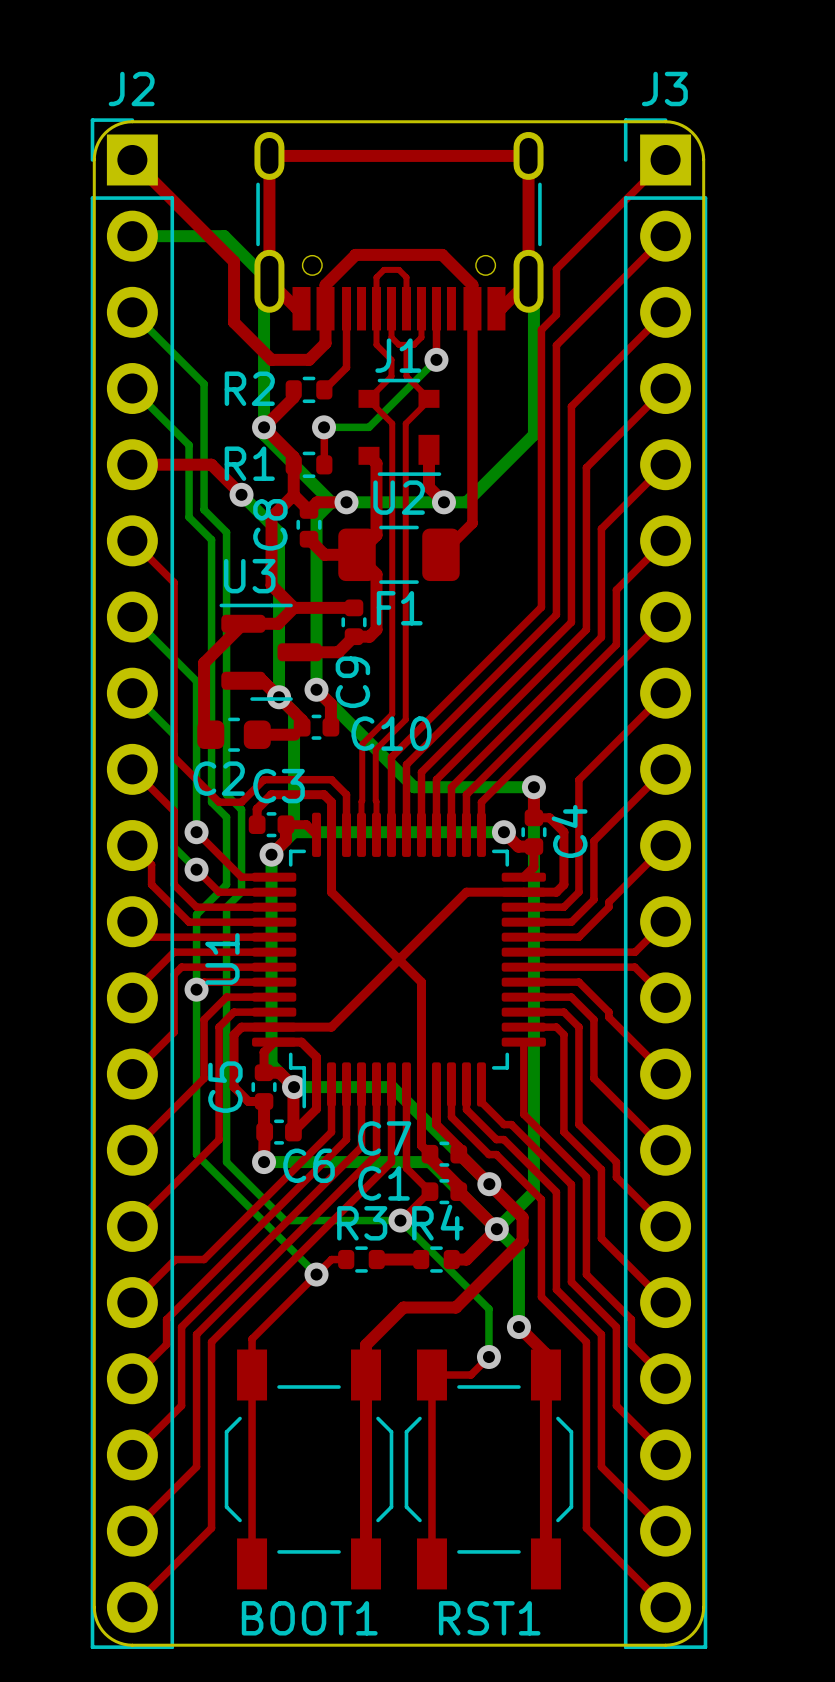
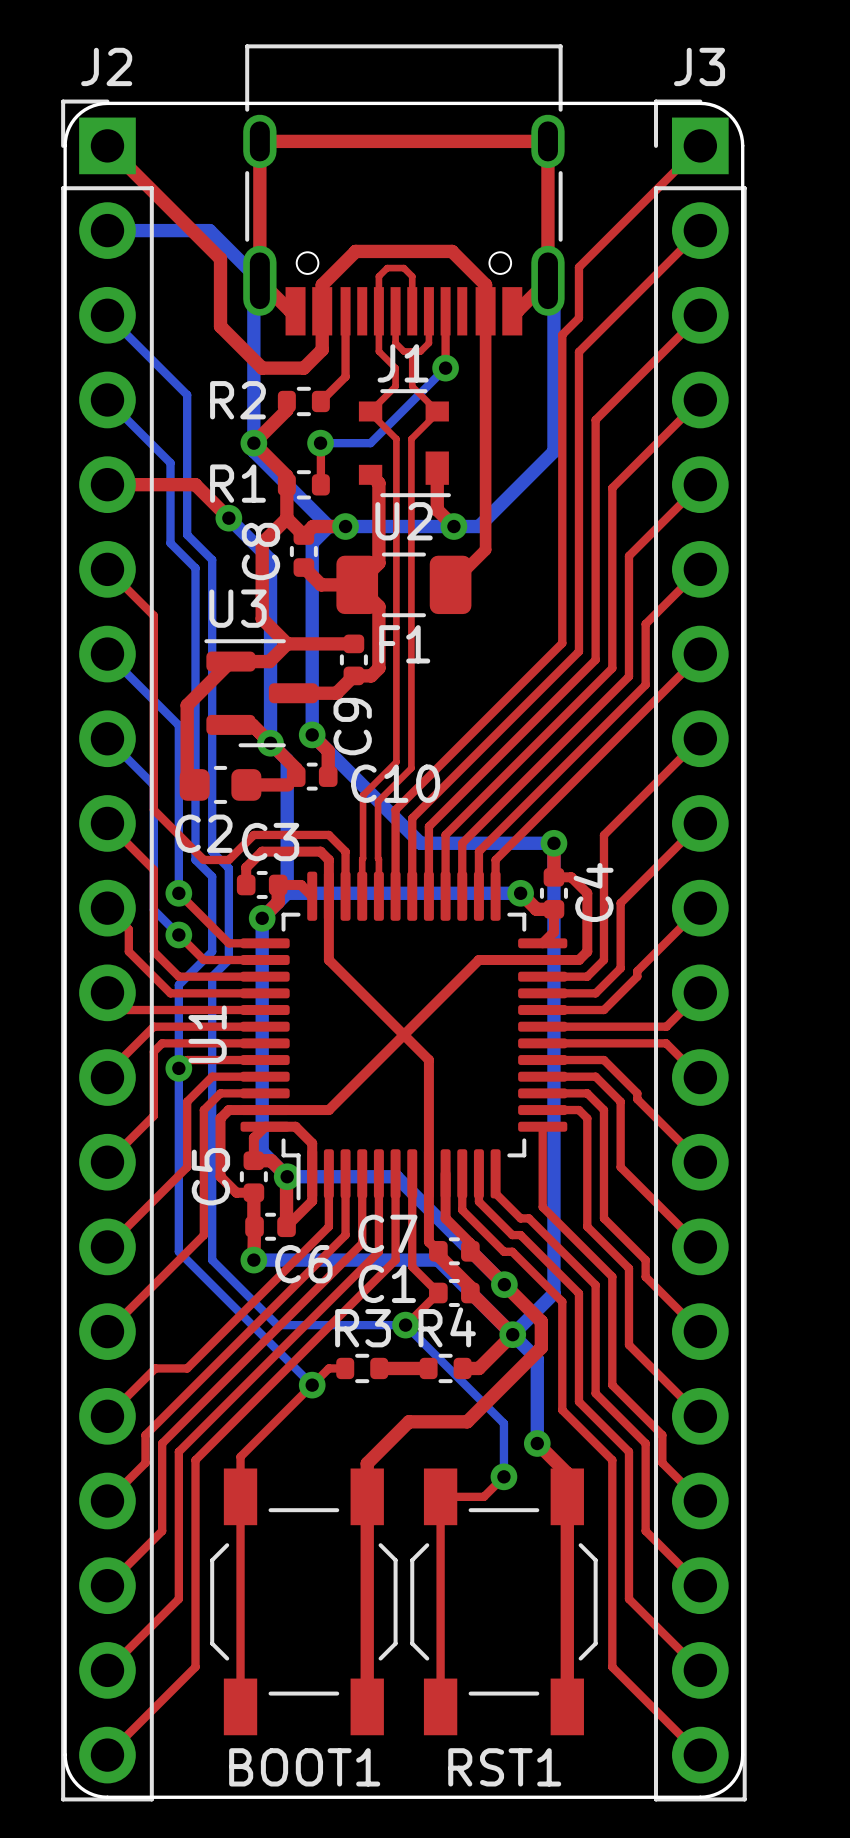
J1 footprint: [254, 131, 544, 331] -> [243, 44, 565, 336]

